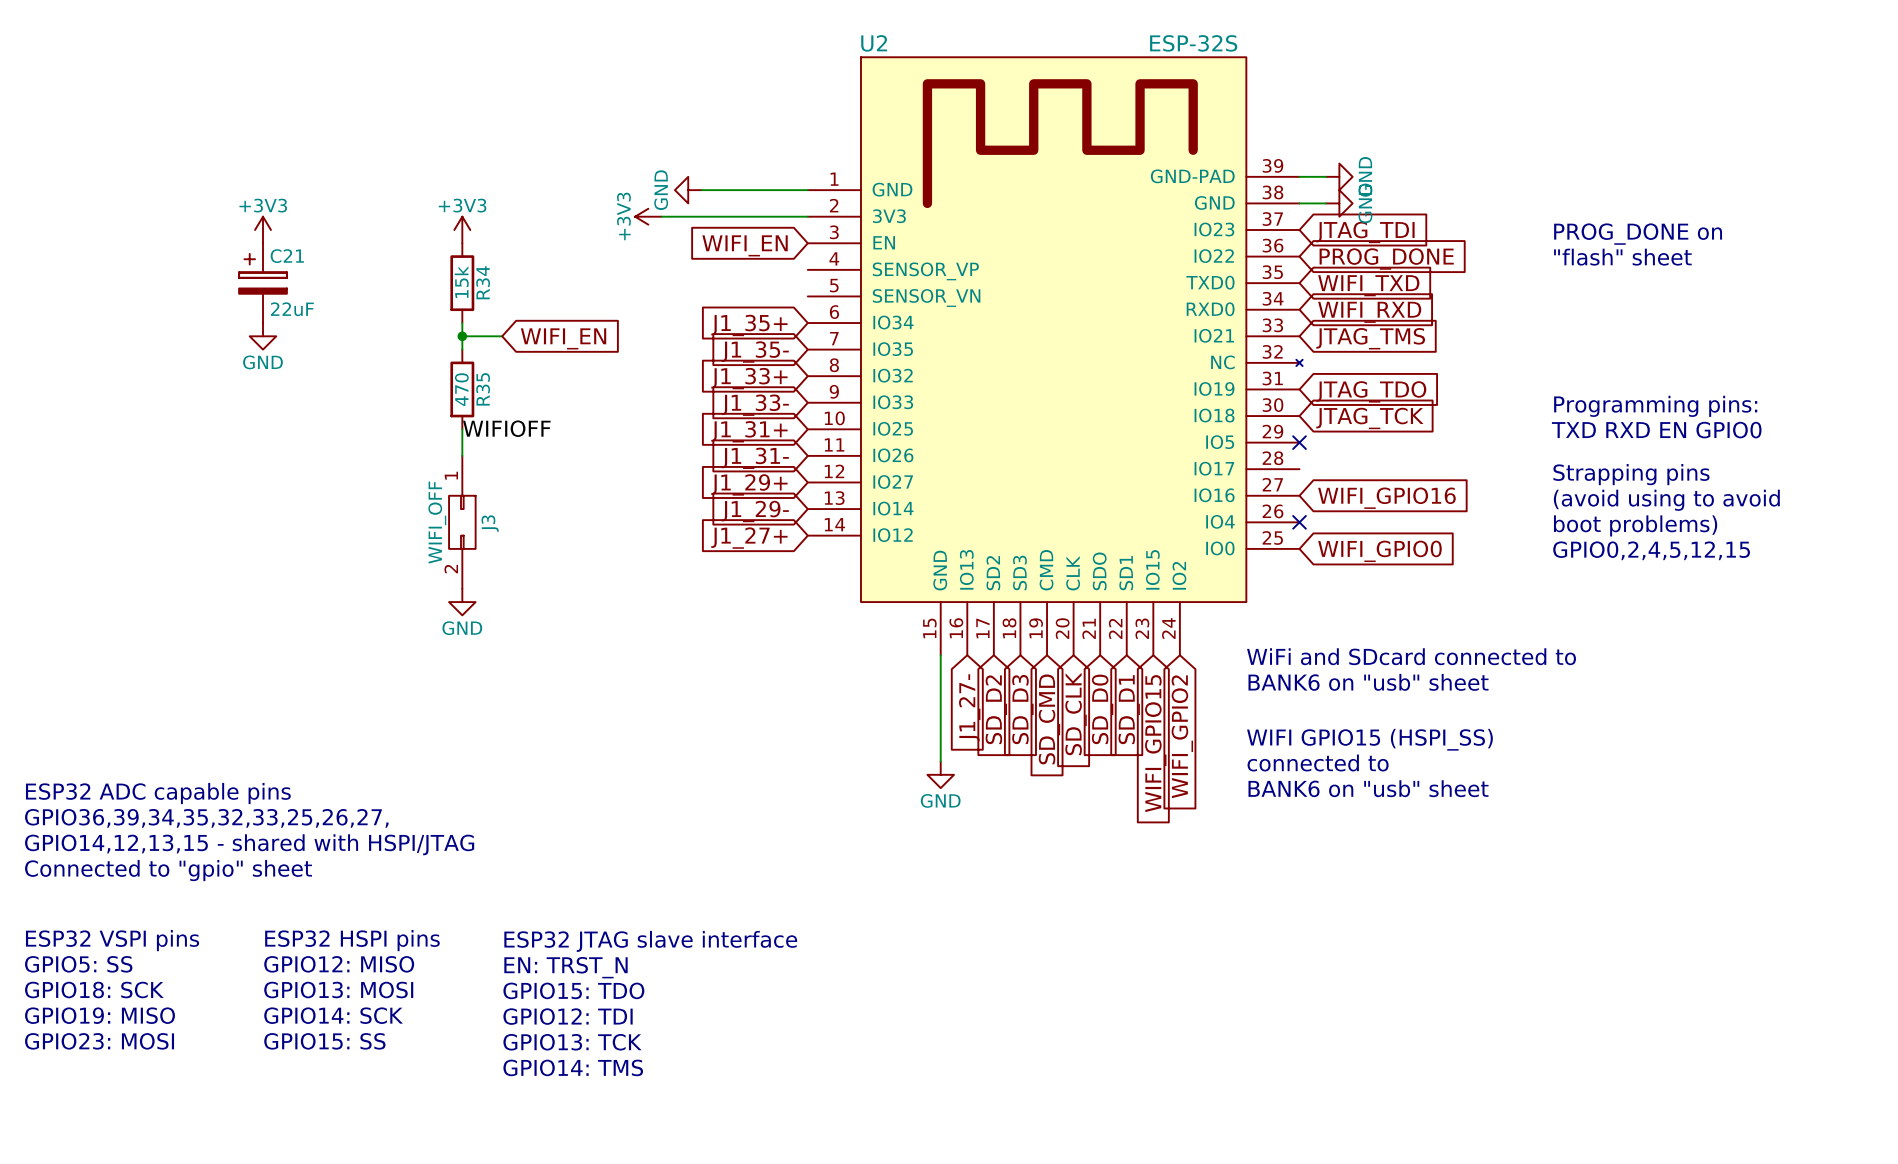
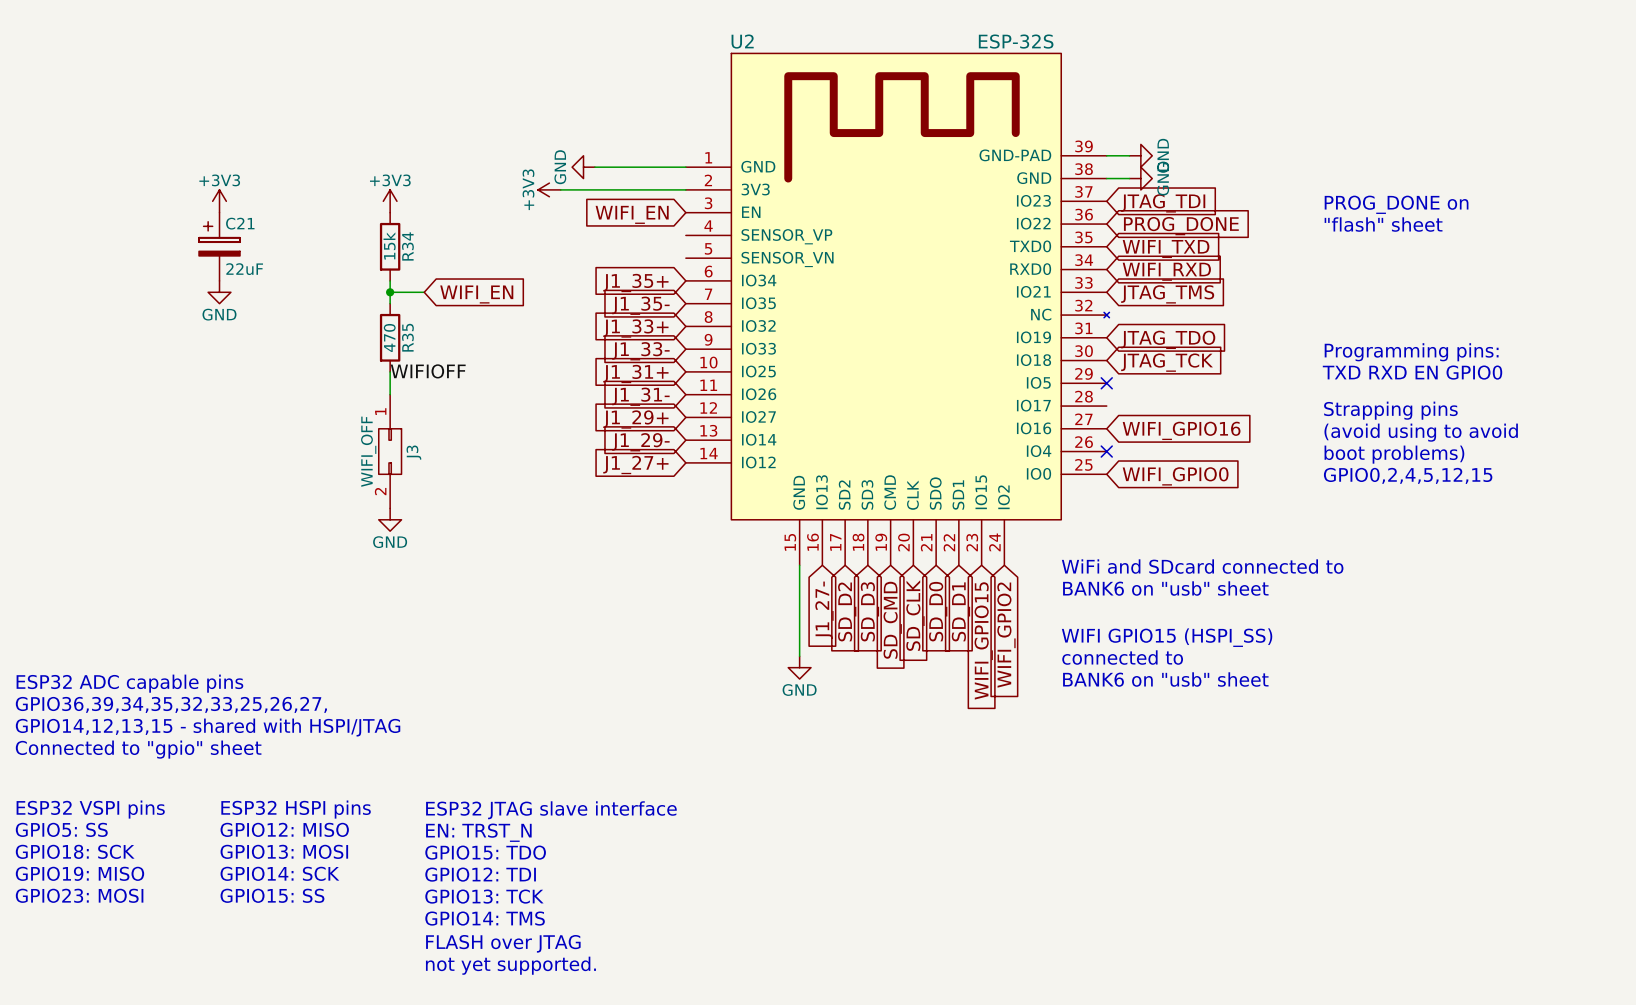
text: none -> FLASH over JTAG (503, 943)
text: none -> not yet supported. (510, 965)

